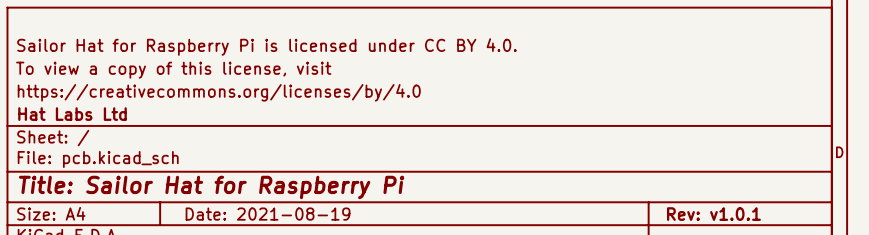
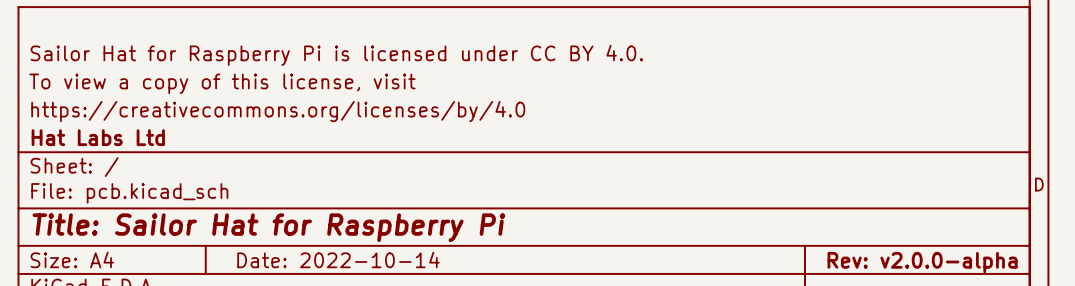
title block: Date: 2021-08-19 (268, 214) -> Date: 2022-10-14 (338, 259)
title block: Rev: v1.0.1 (713, 214) -> Rev: v2.0.0-alpha (922, 262)

